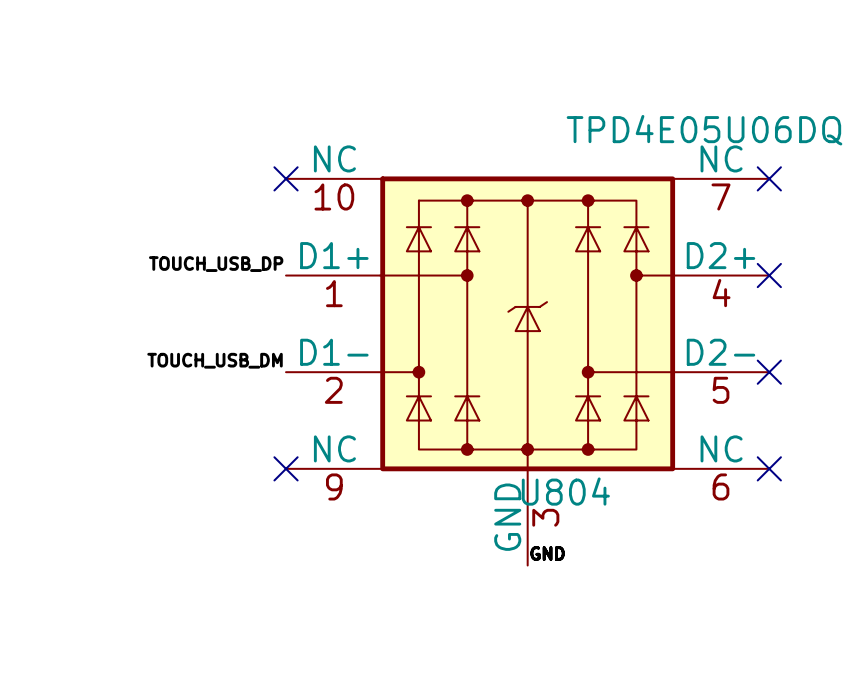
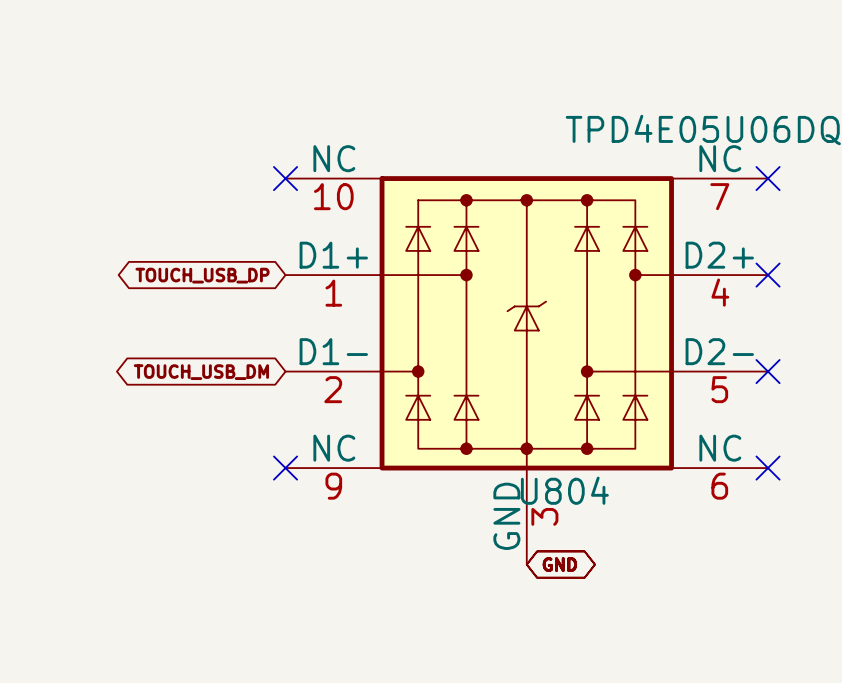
label: TOUCH_USB_DP (216, 264) -> none
global label: none -> TOUCH_USB_DP (202, 275)
label: TOUCH_USB_DM (215, 360) -> none
global label: none -> TOUCH_USB_DM (201, 372)
label: GND (547, 553) -> none
global label: none -> GND (559, 564)

